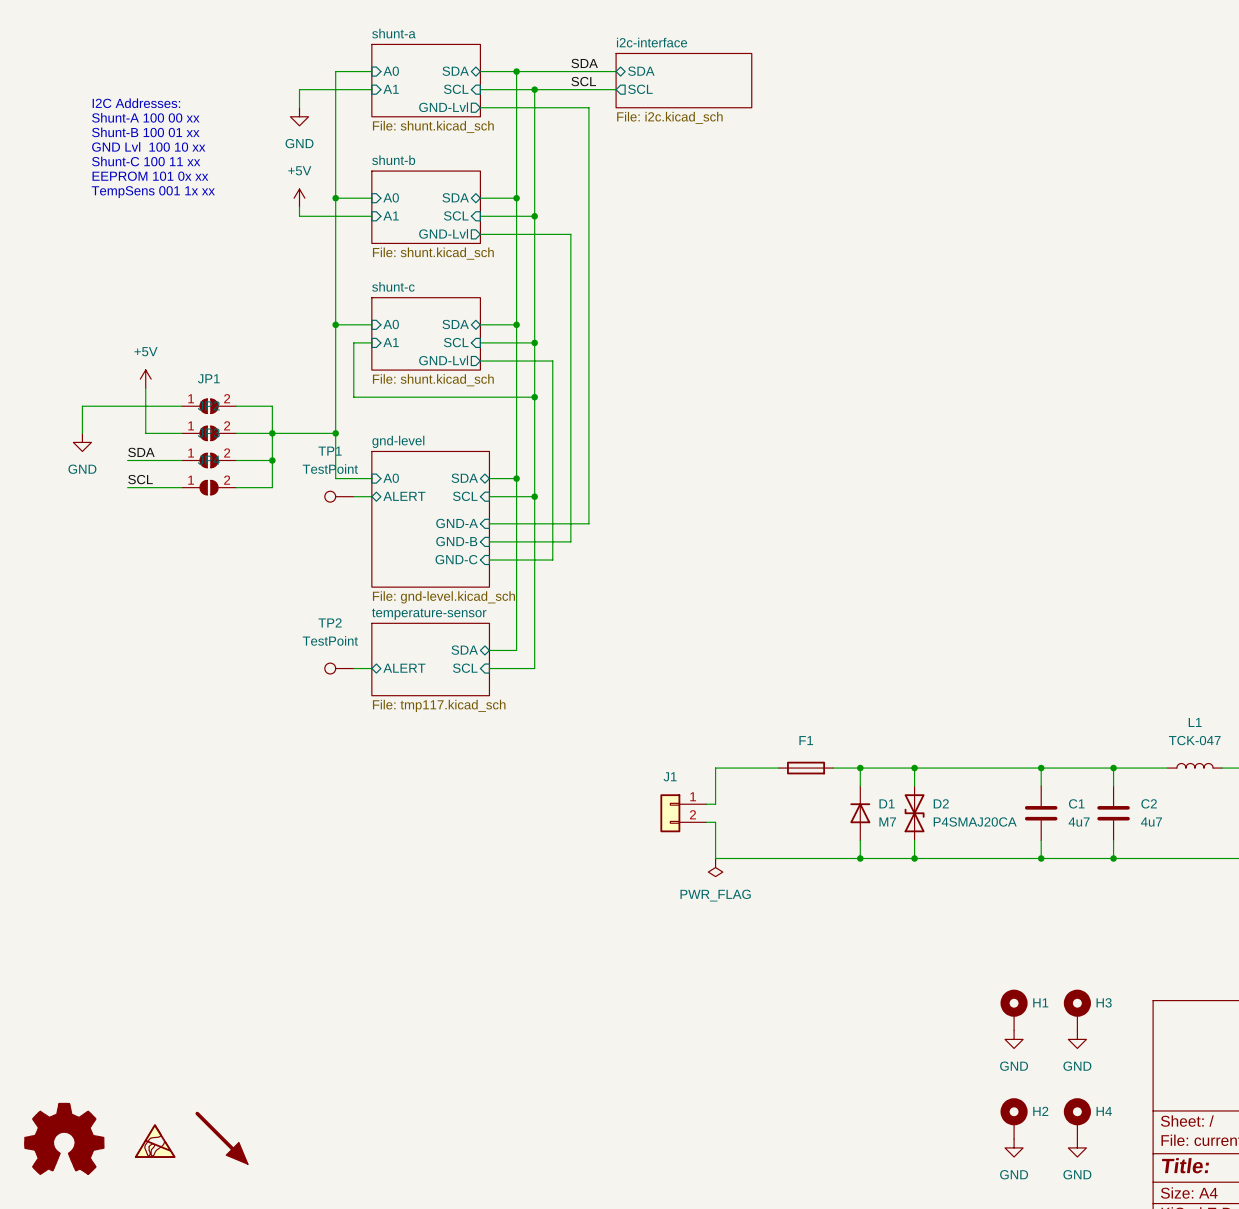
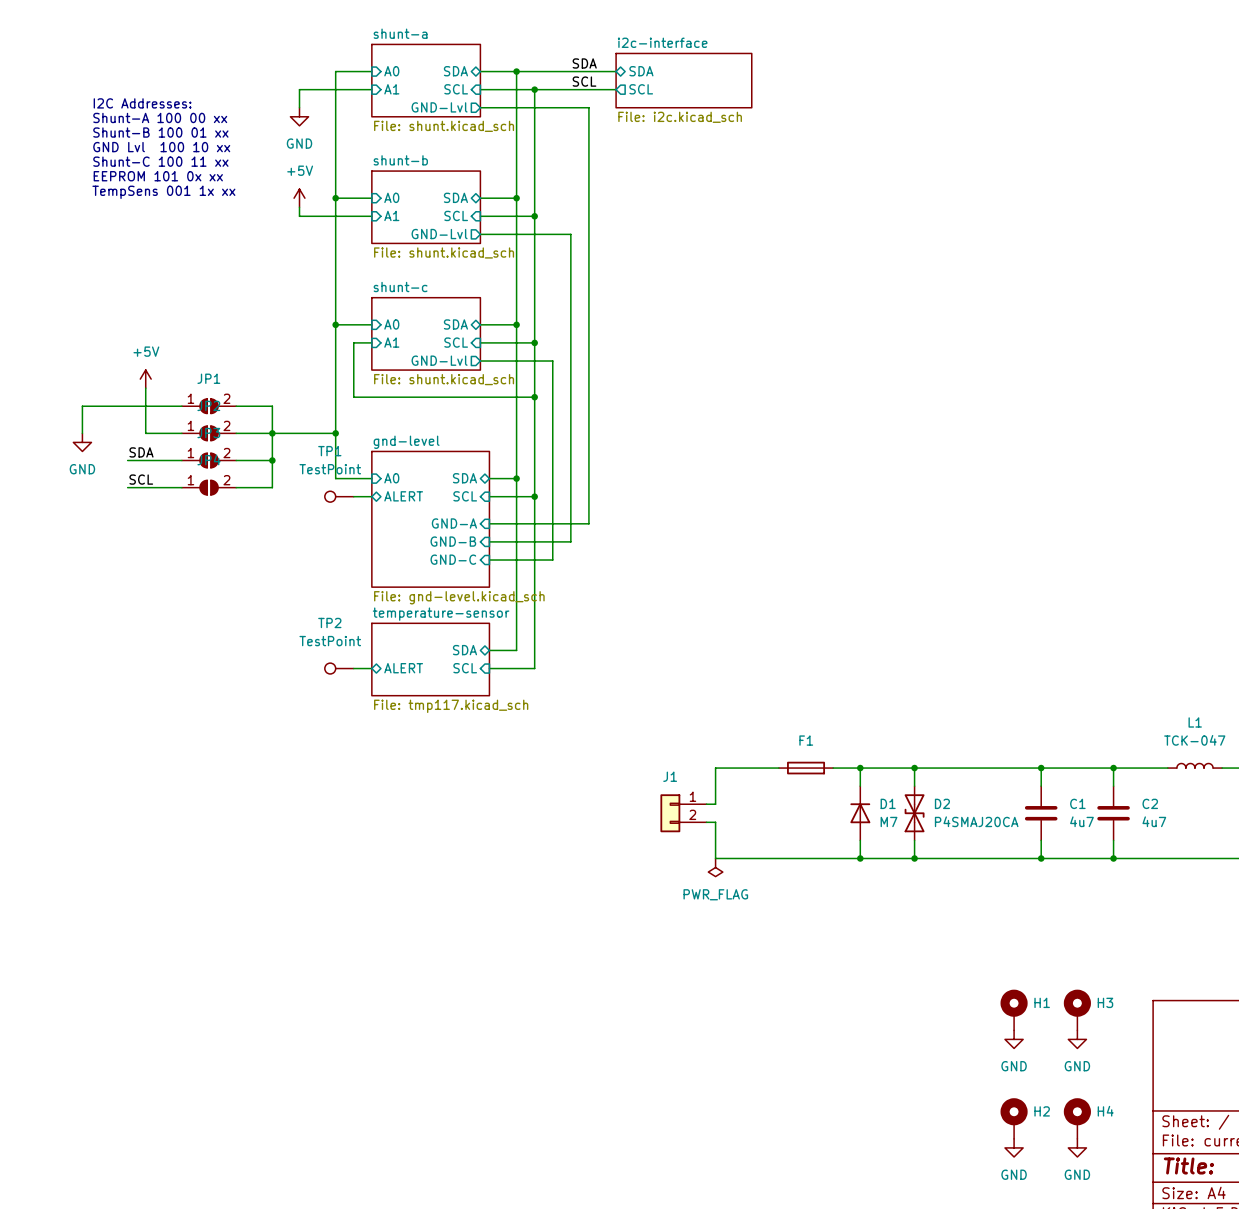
part: (221, 1137) -> none
part: (64, 1138) -> none
part: (155, 1141) -> none

